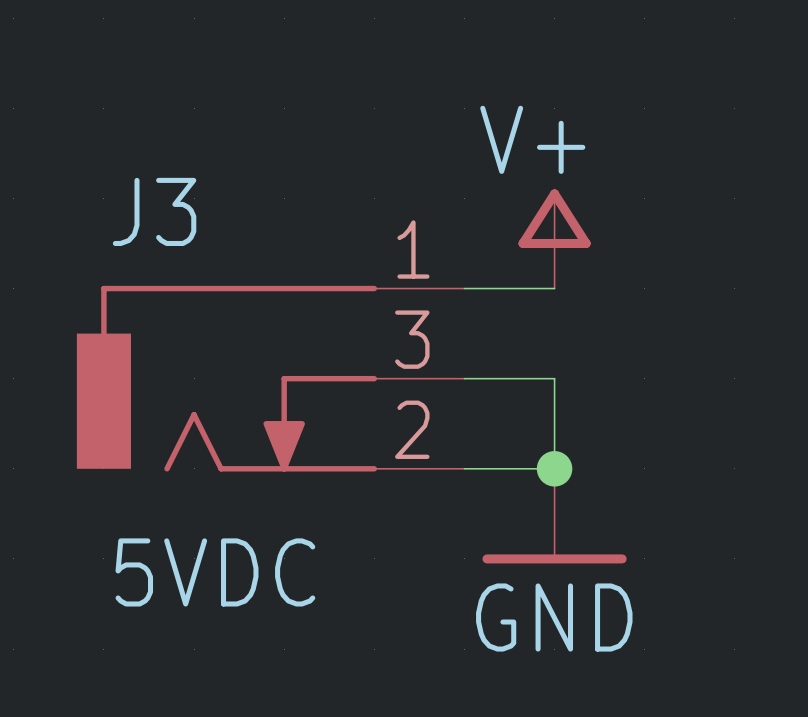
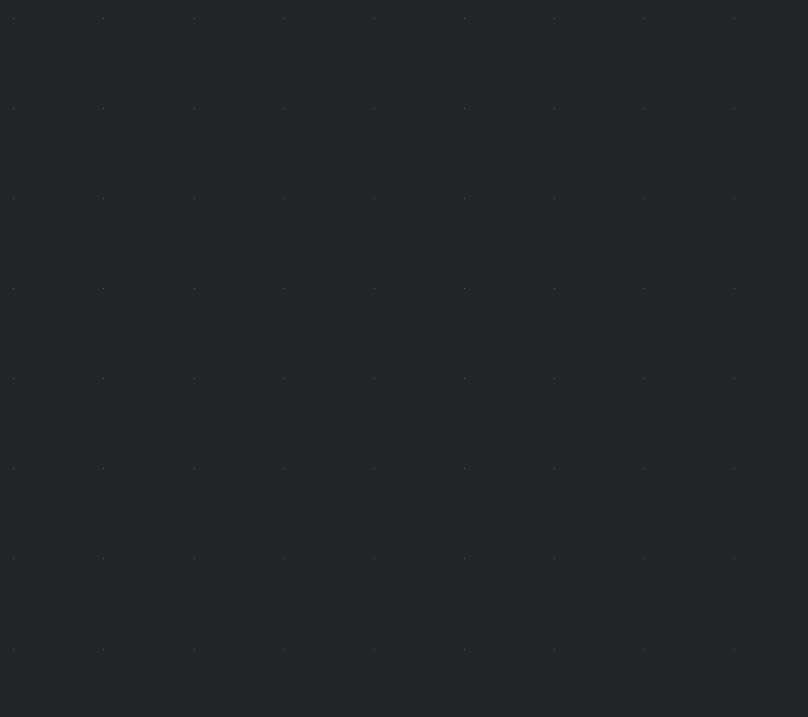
power symbol: V+ (554, 238) -> none
wire: (464, 288) (554, 288) -> none
J3: 5VDC (270, 378) -> none
wire: (464, 378) (554, 378) (554, 468) (464, 468) -> none
junction: (554, 468) -> none
power symbol: GND (554, 516) -> none

